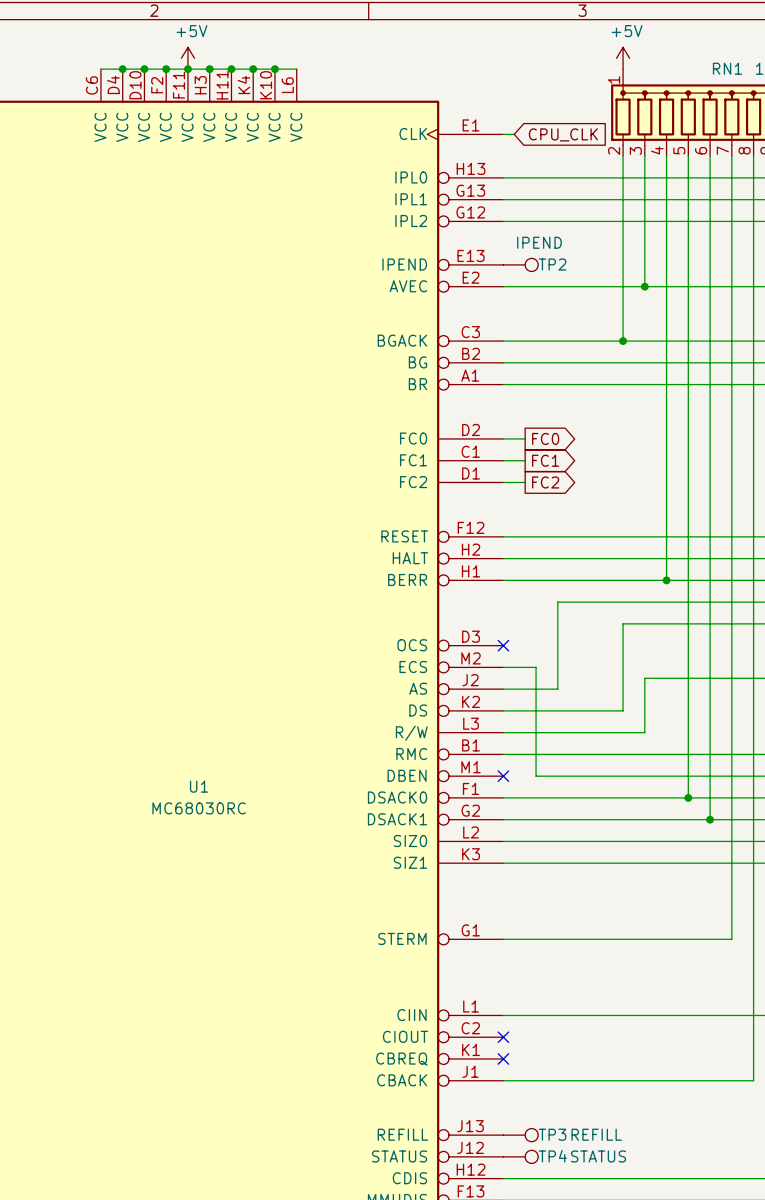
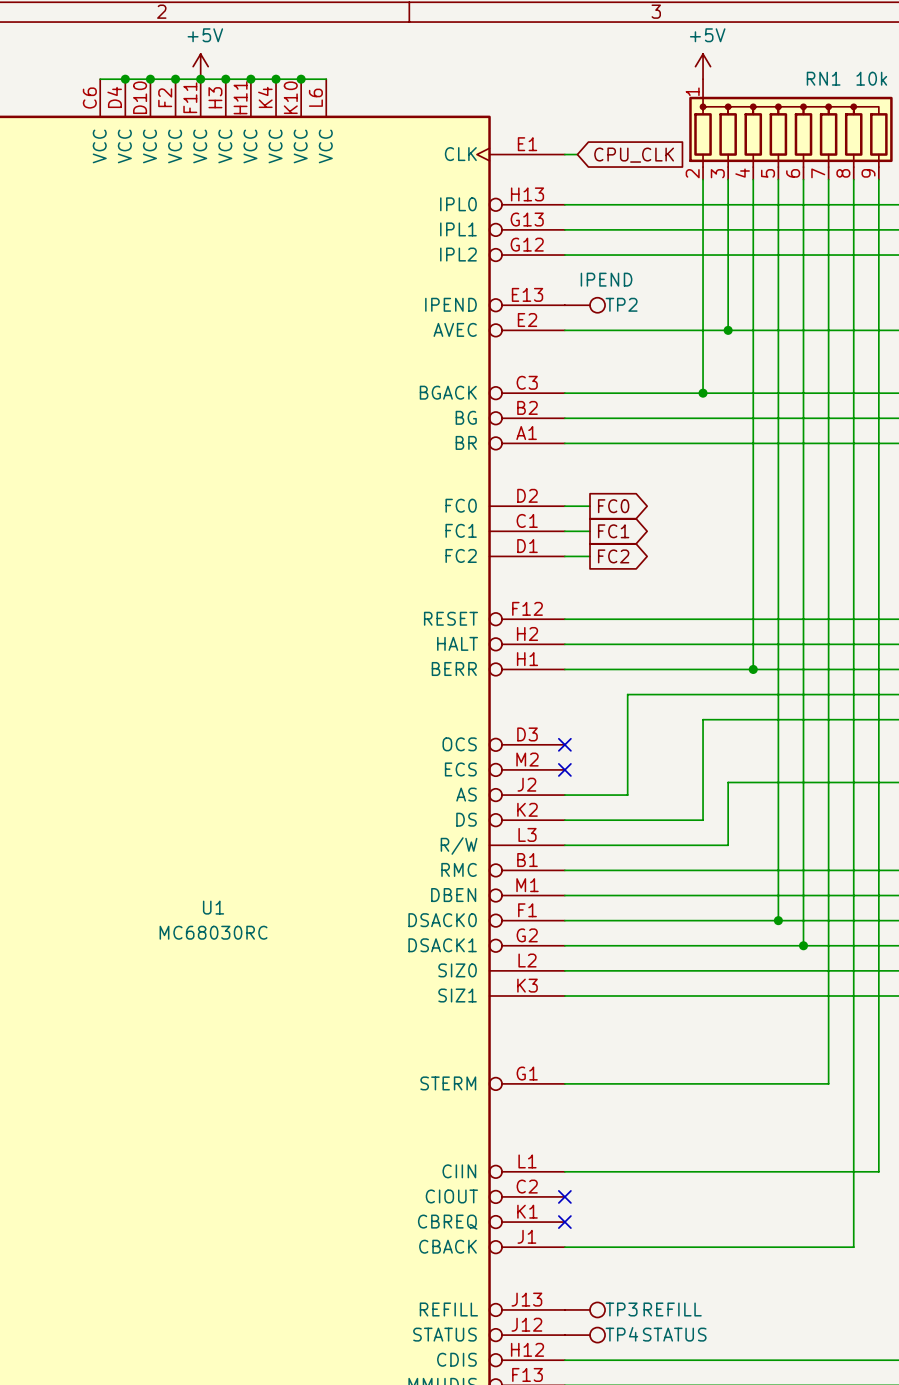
wire: (503, 667) (536, 667) (536, 776) -> (564, 895) (602, 895)
no-connect mark: none -> (564, 769)
no-connect mark: (503, 776) -> none

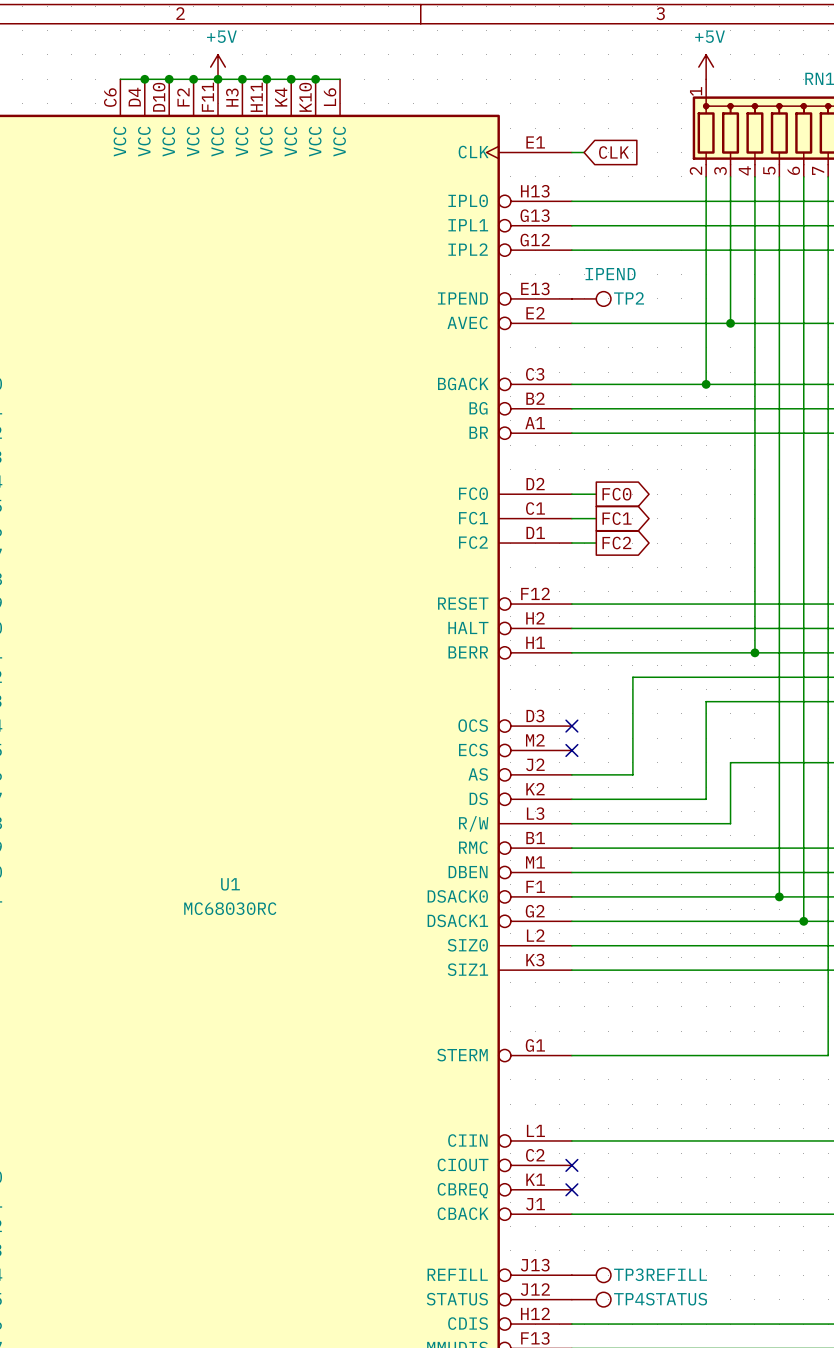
global label: CPU_CLK (634, 155) -> CLK (613, 152)

